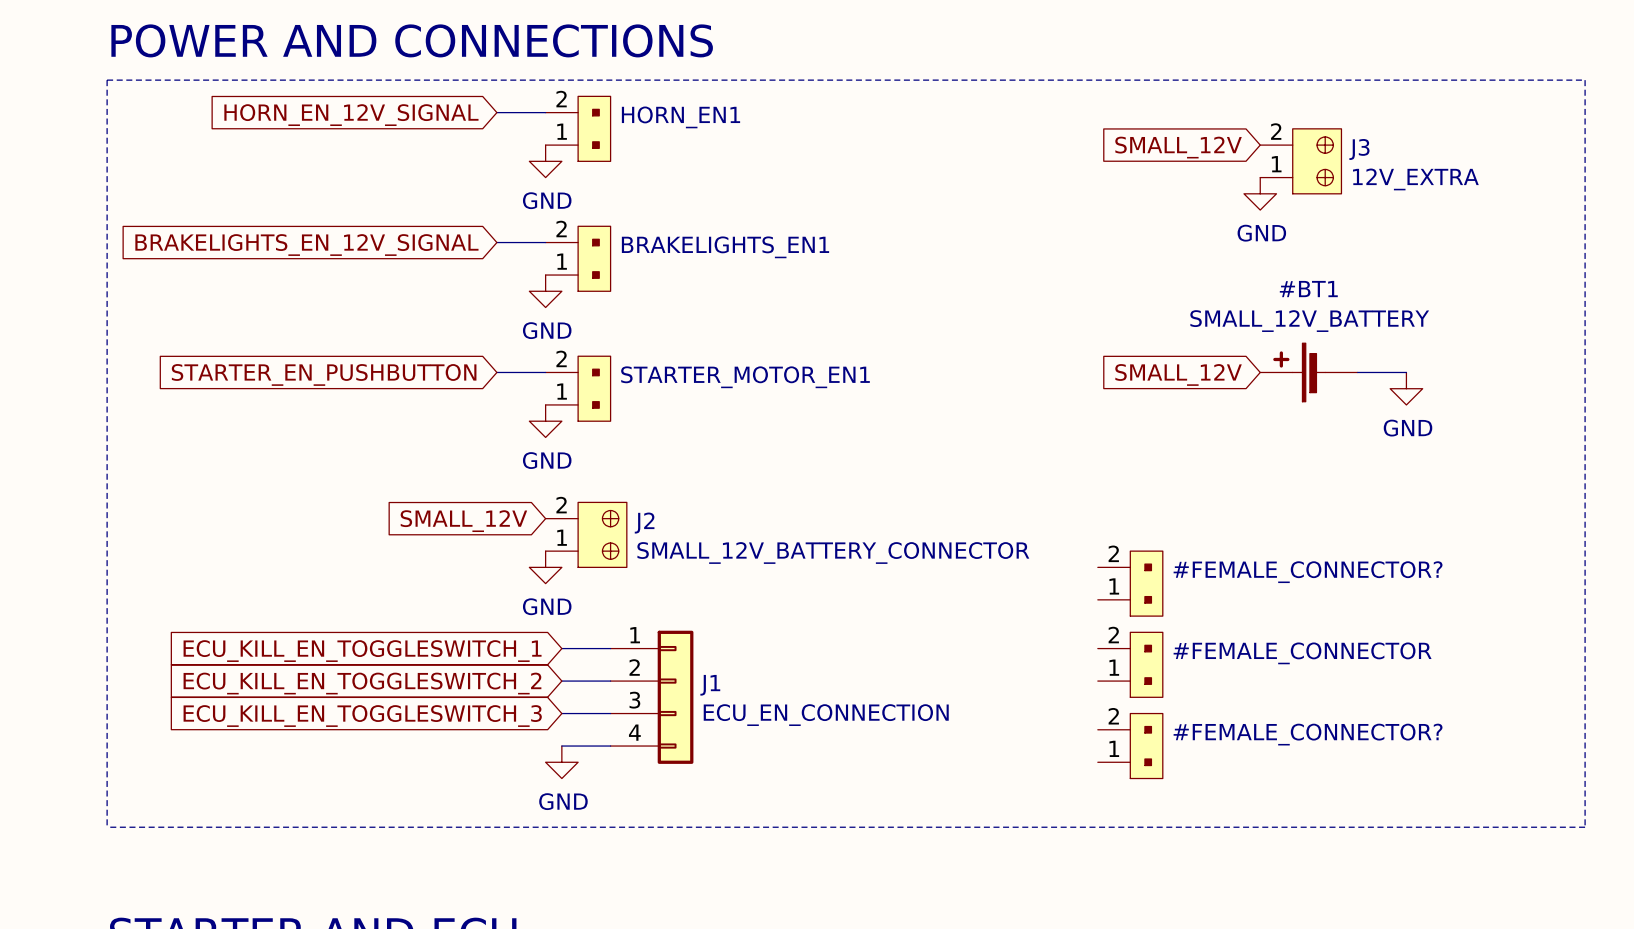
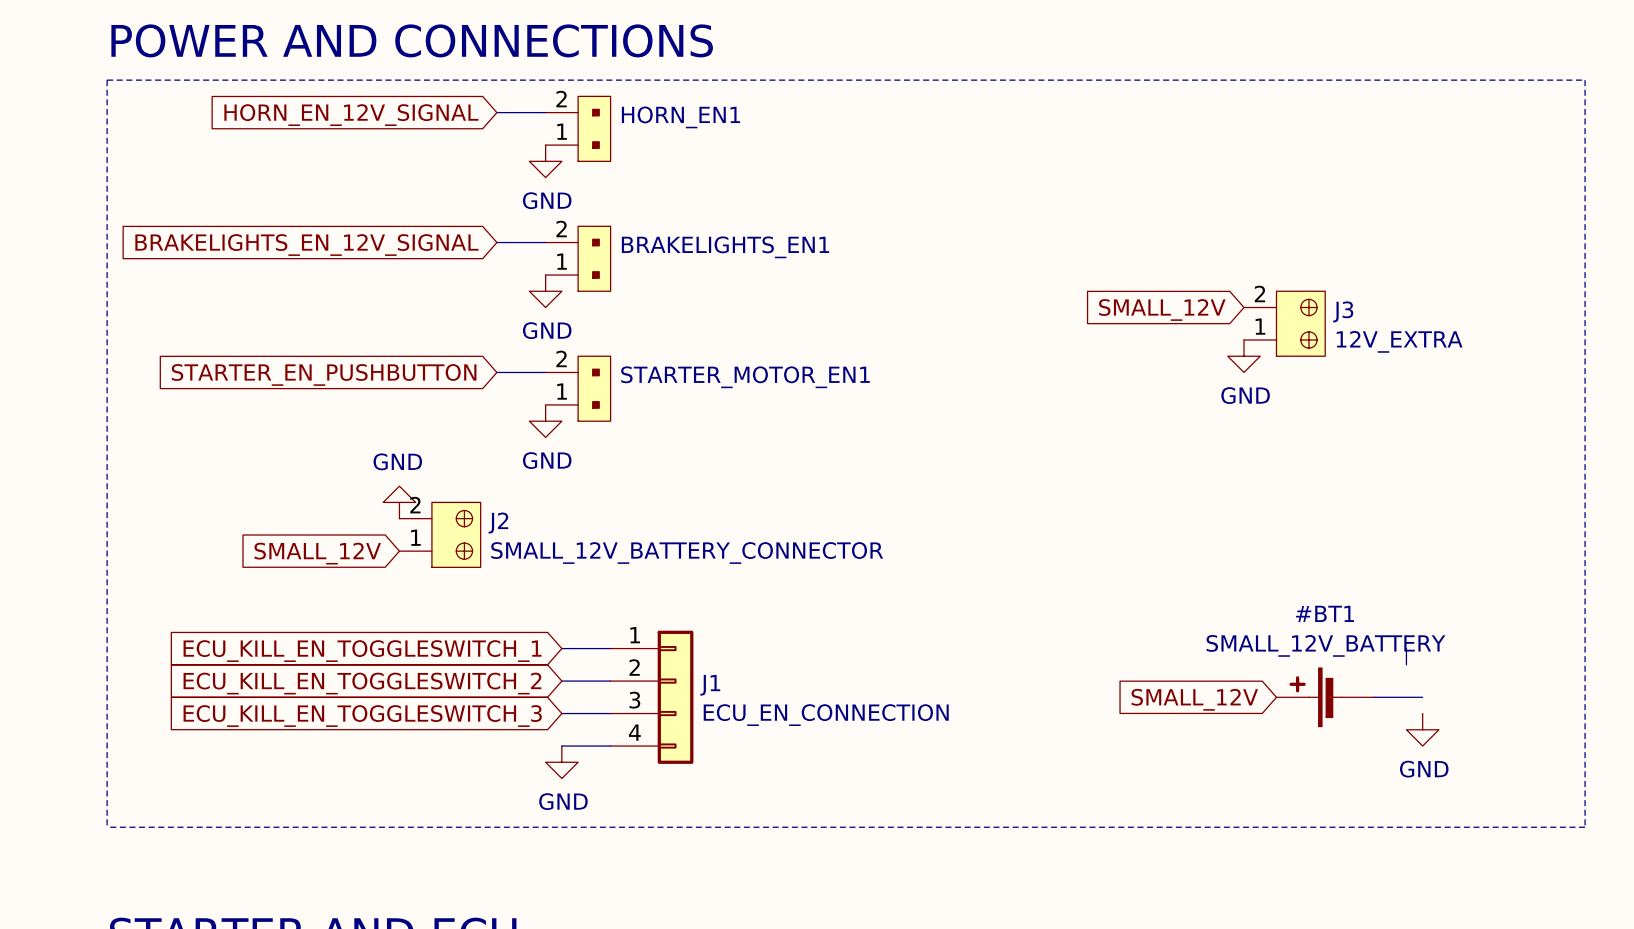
global label: SMALL_12V (1178, 147) -> none
J3 position: (1300, 161) -> (1284, 323)
power symbol: GND (1260, 193) -> none
power symbol: none -> GND (1244, 356)
#BT1 position: SMALL_12V_BATTERY (1308, 372) -> SMALL_12V_BATTERY (1325, 697)
wire: (1357, 372) (1406, 372) -> none
global label position: SMALL_12V (1178, 374) -> SMALL_12V (1162, 309)
power symbol: GND (1406, 388) -> none
global label position: SMALL_12V (463, 521) -> SMALL_12V (317, 553)
J2 position: (586, 534) -> (440, 534)
power symbol rotation: 0° (545, 567) -> 180° (399, 502)
power symbol position: GND (545, 567) -> GND (399, 502)
#FEMALE_CONNECTOR?: (1130, 583) -> none
wire: none -> (1406, 648) (1406, 664)
#FEMALE_CONNECTOR: (1130, 664) -> none
wire: none -> (1373, 697) (1422, 697)
global label: none -> SMALL_12V (1194, 699)
power symbol: none -> GND (1422, 729)
#FEMALE_CONNECTOR?: (1130, 746) -> none

